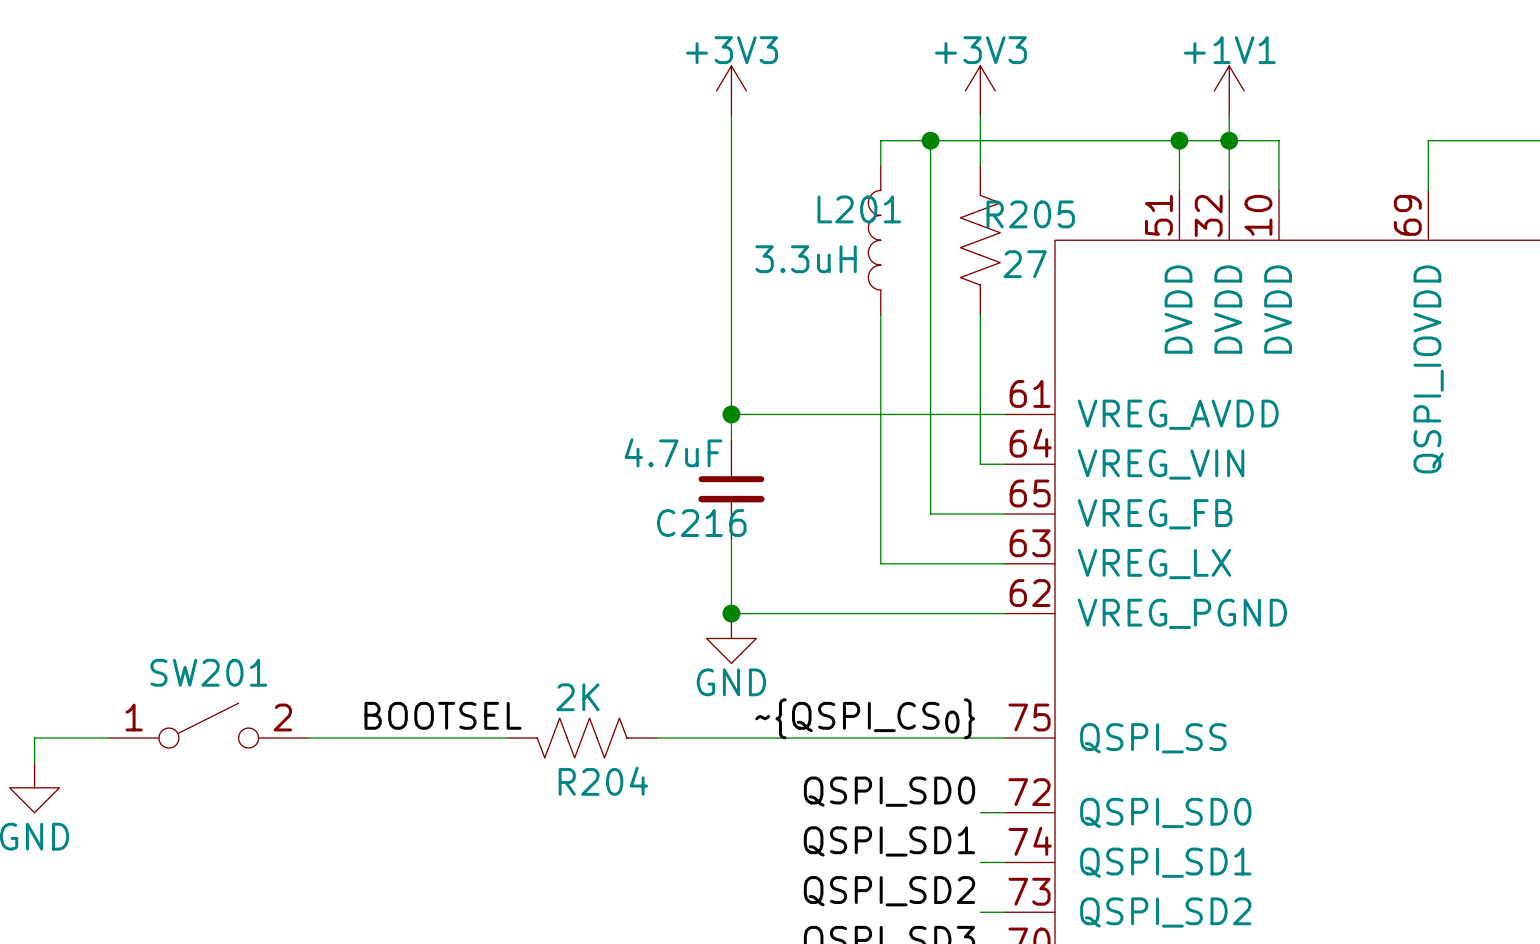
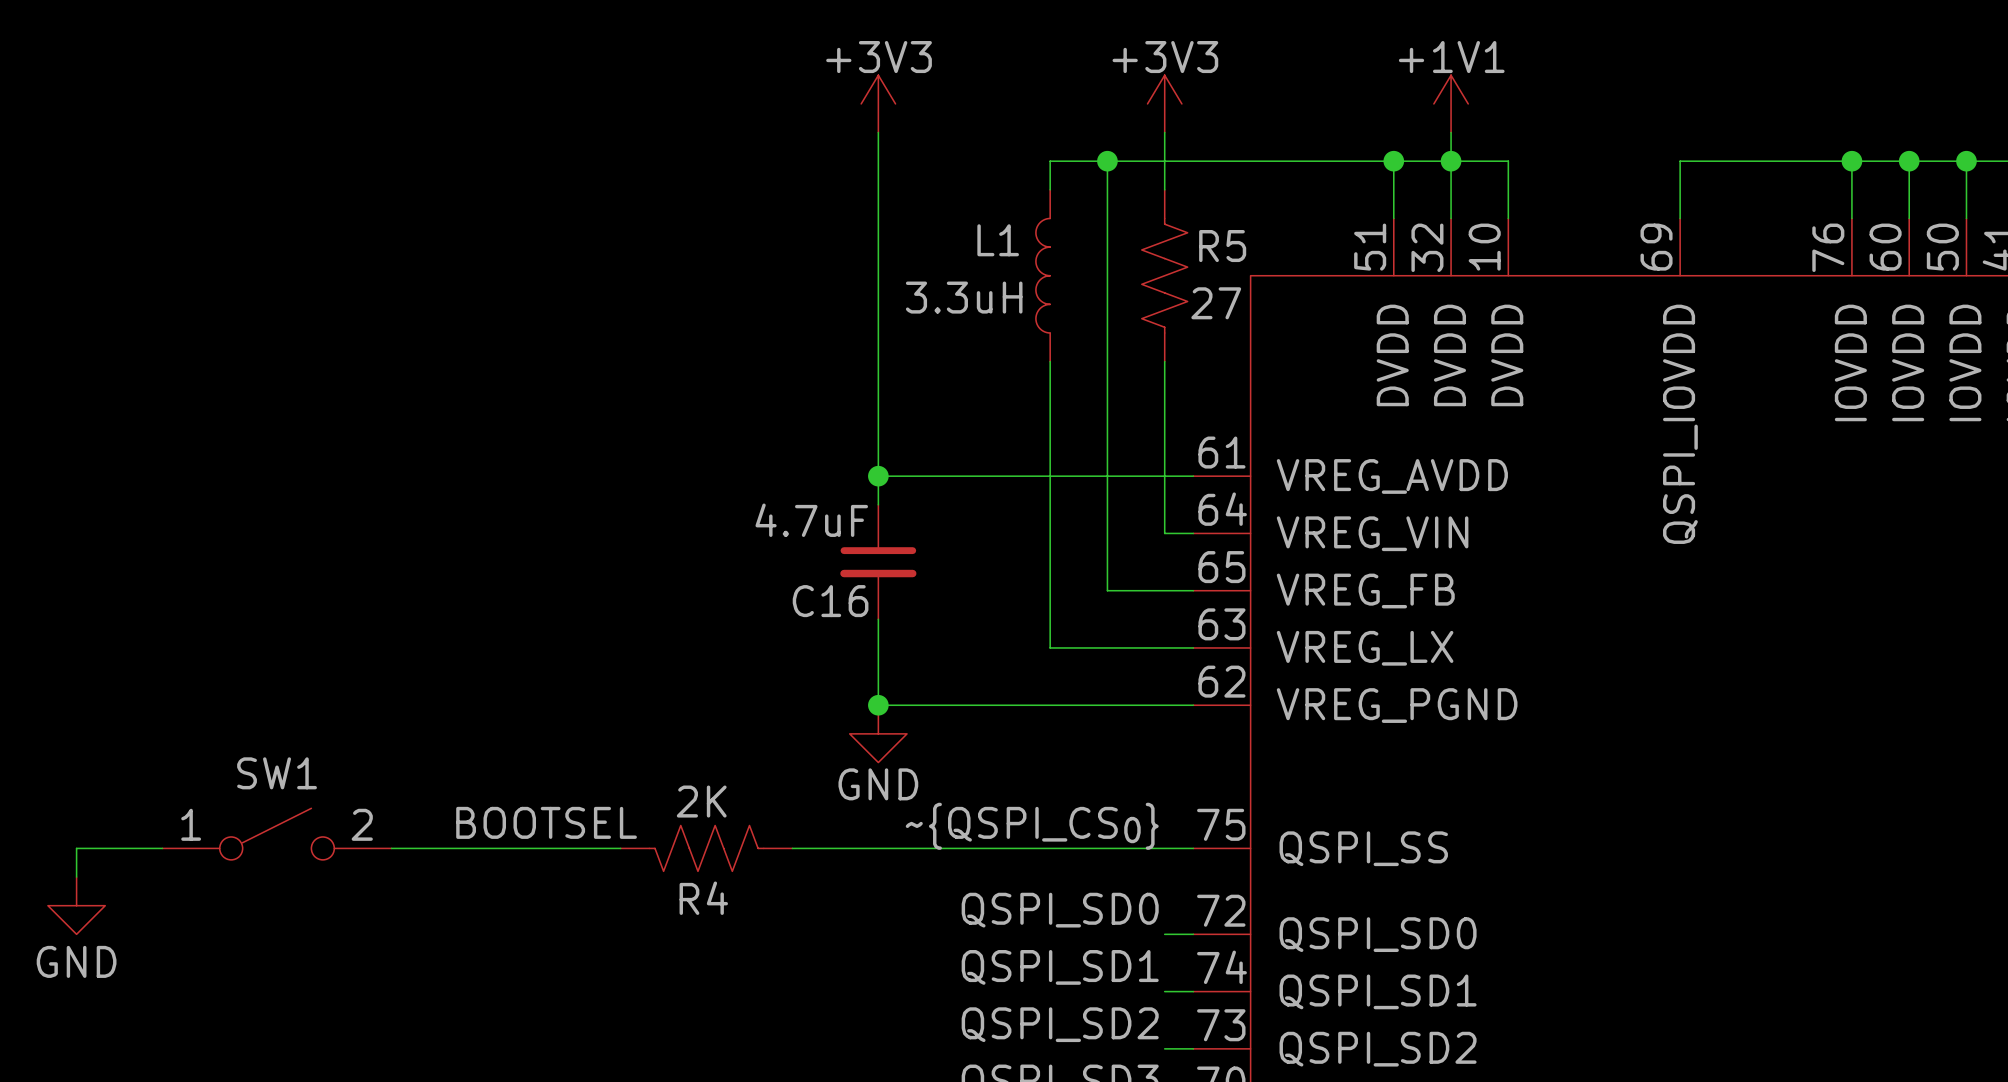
L201 name: L201 (859, 209) -> L1 (998, 240)
R205 name: R205 (1030, 214) -> R5 (1222, 246)
C216 name: C216 (701, 523) -> C16 (830, 601)
SW201 name: SW201 (208, 672) -> SW1 (277, 773)
R204 name: R204 (603, 781) -> R4 (703, 898)

